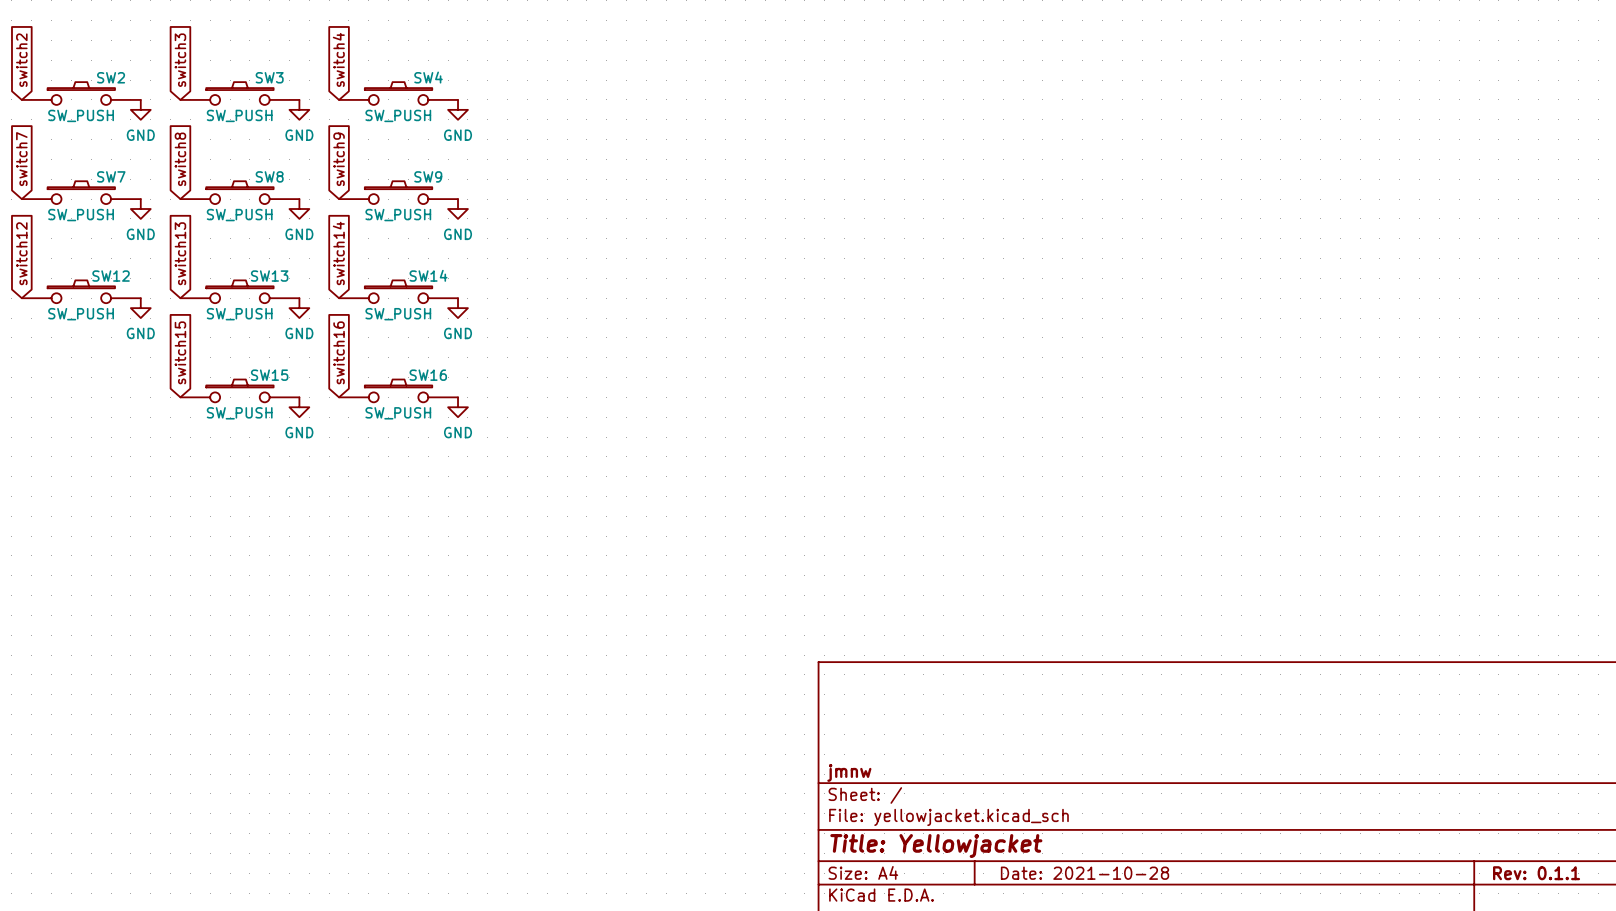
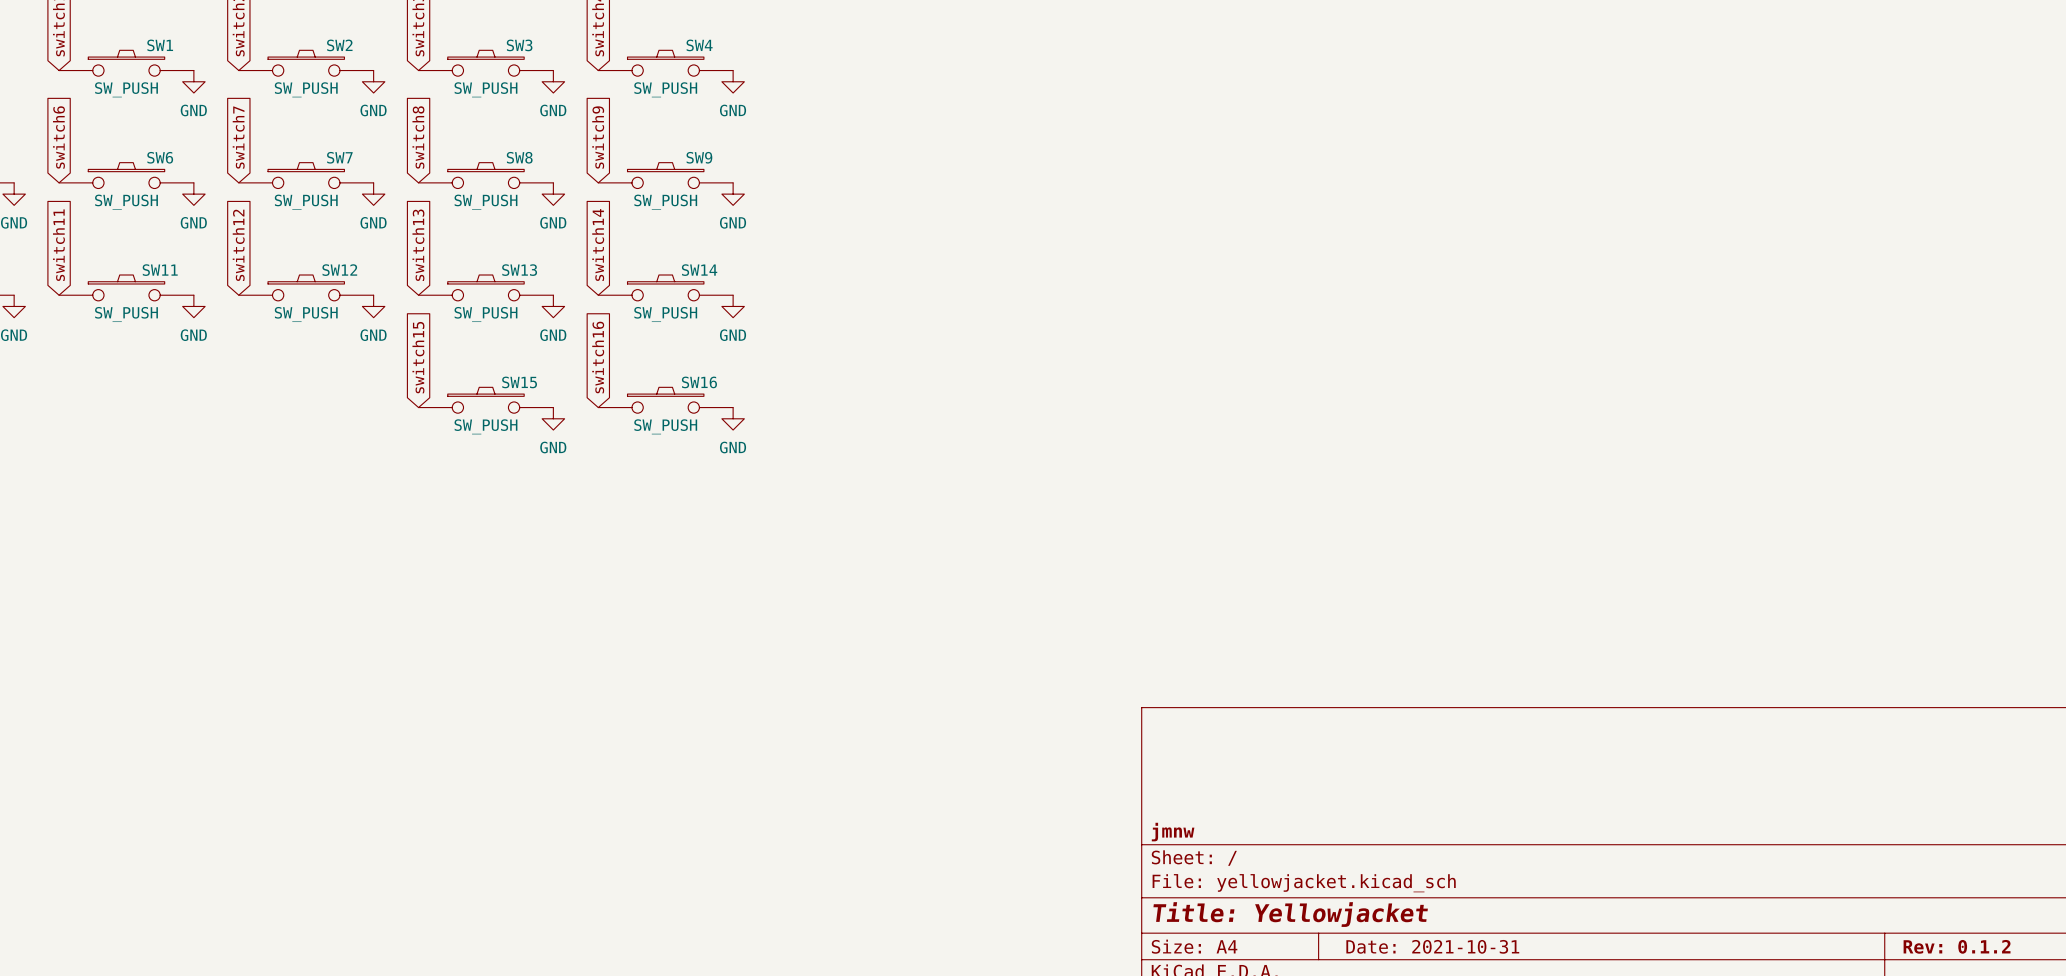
title block: Date: 2021-10-28 (1085, 873) -> Date: 2021-10-31 (1432, 946)
title block: Rev: 0.1.1 (1536, 873) -> Rev: 0.1.2 (1957, 946)

